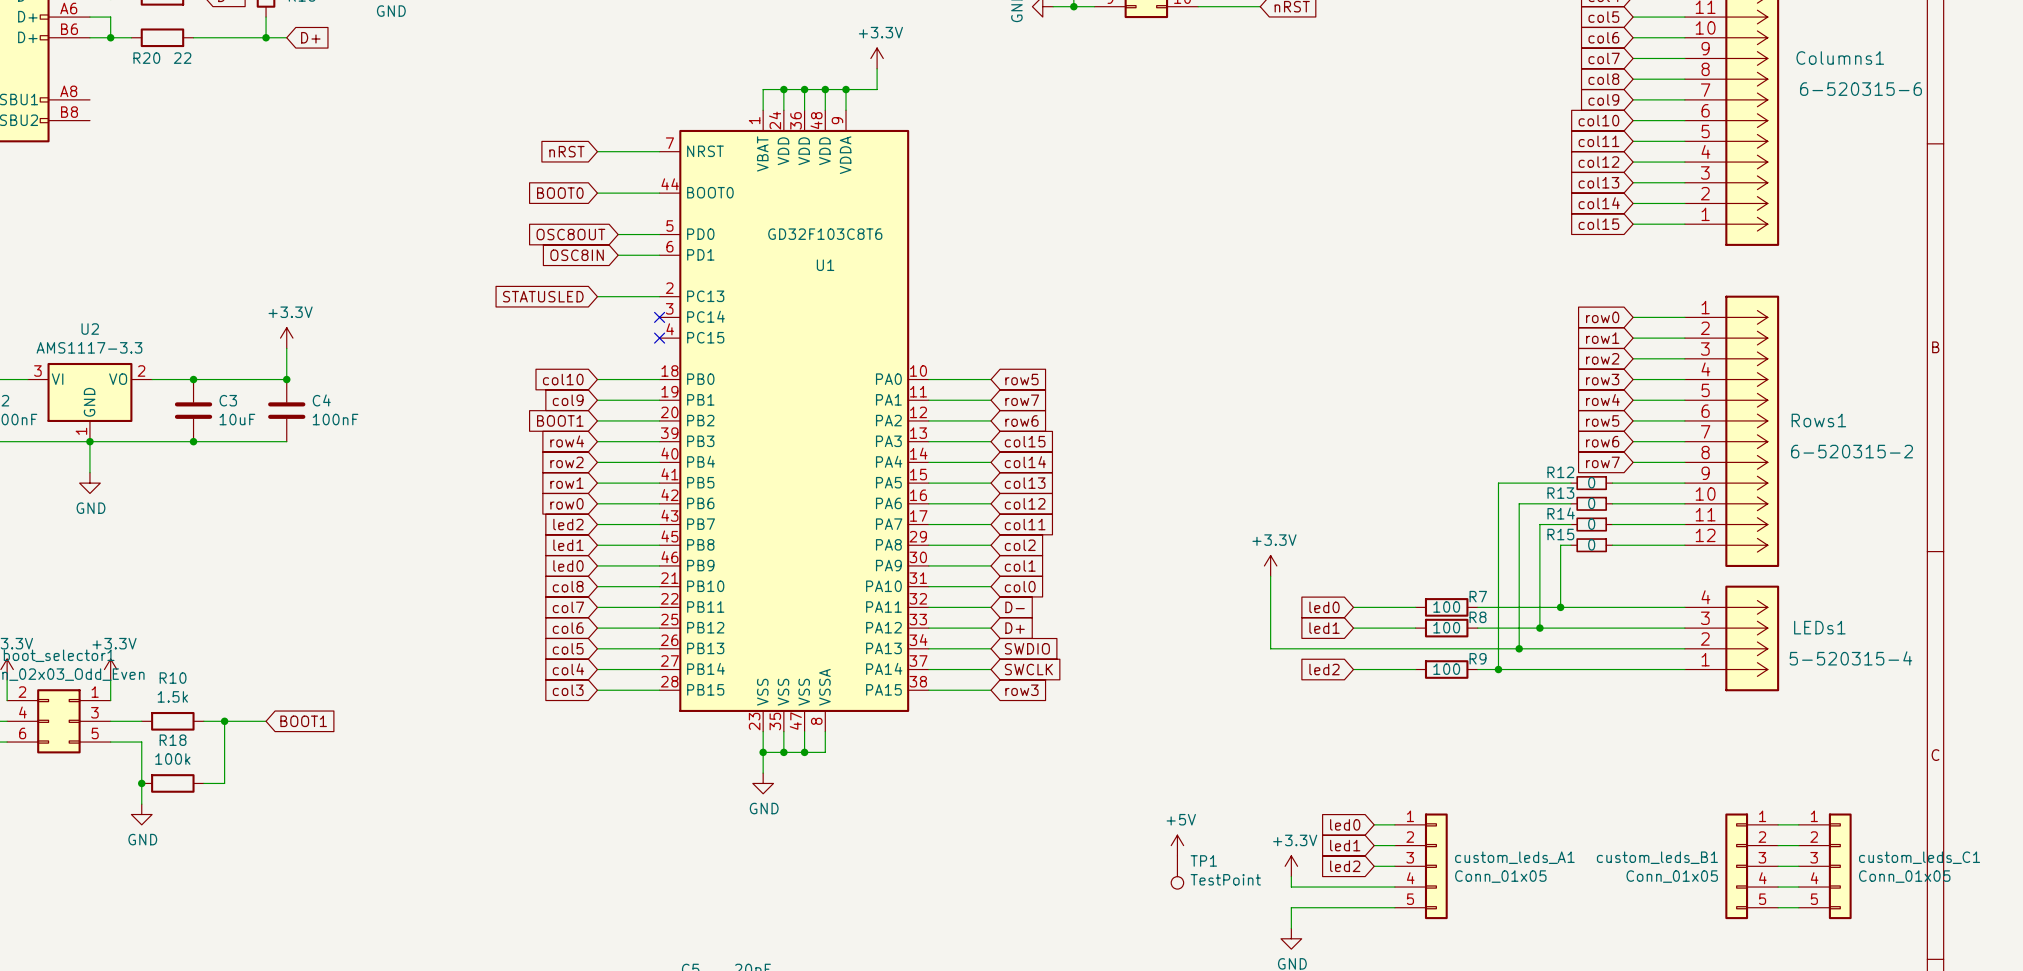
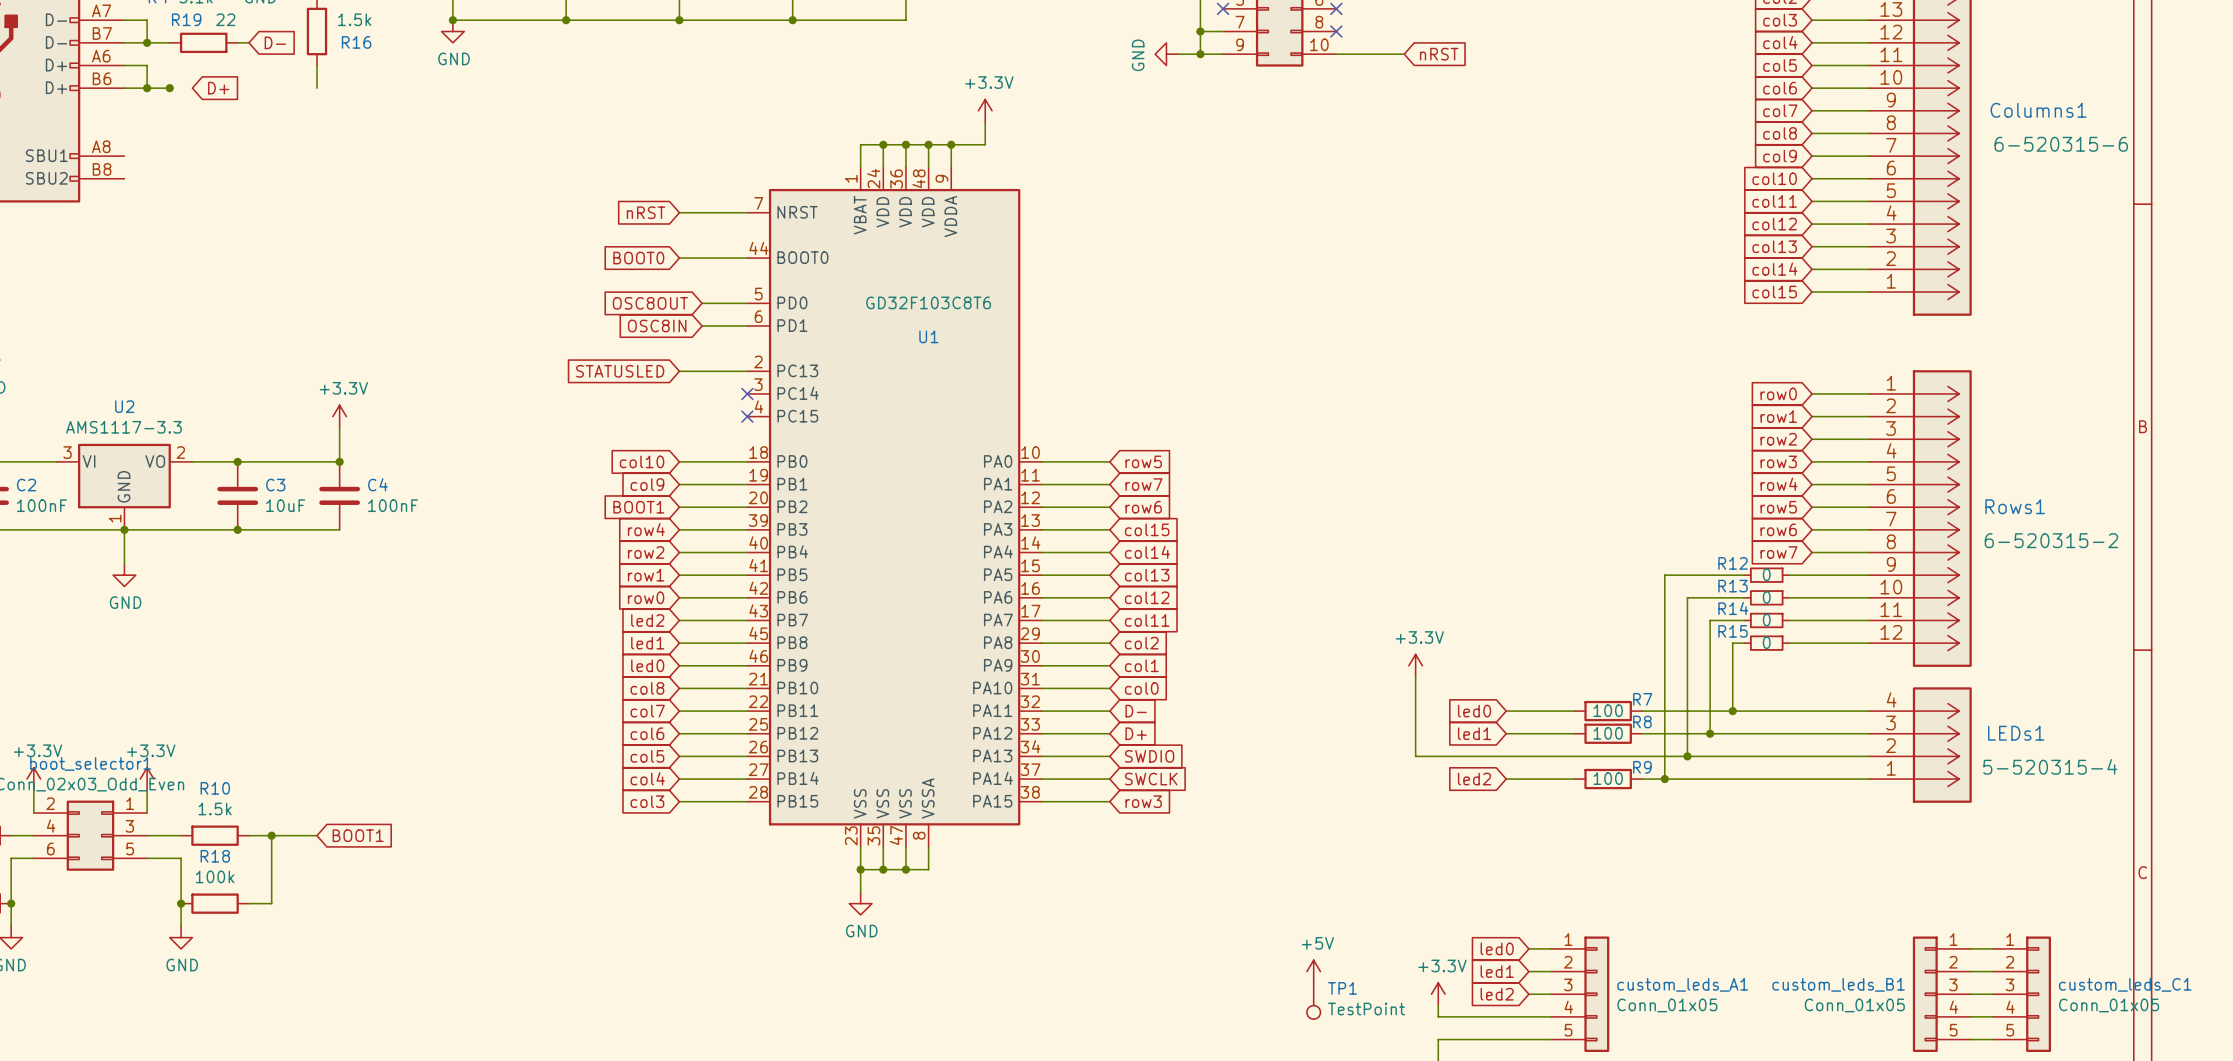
junction: none -> (169, 88)
R20: 22 (162, 37) -> none
wire: (193, 37) (286, 37) -> none
junction: (266, 37) -> none
global label position: D+ (310, 37) -> D+ (218, 88)

